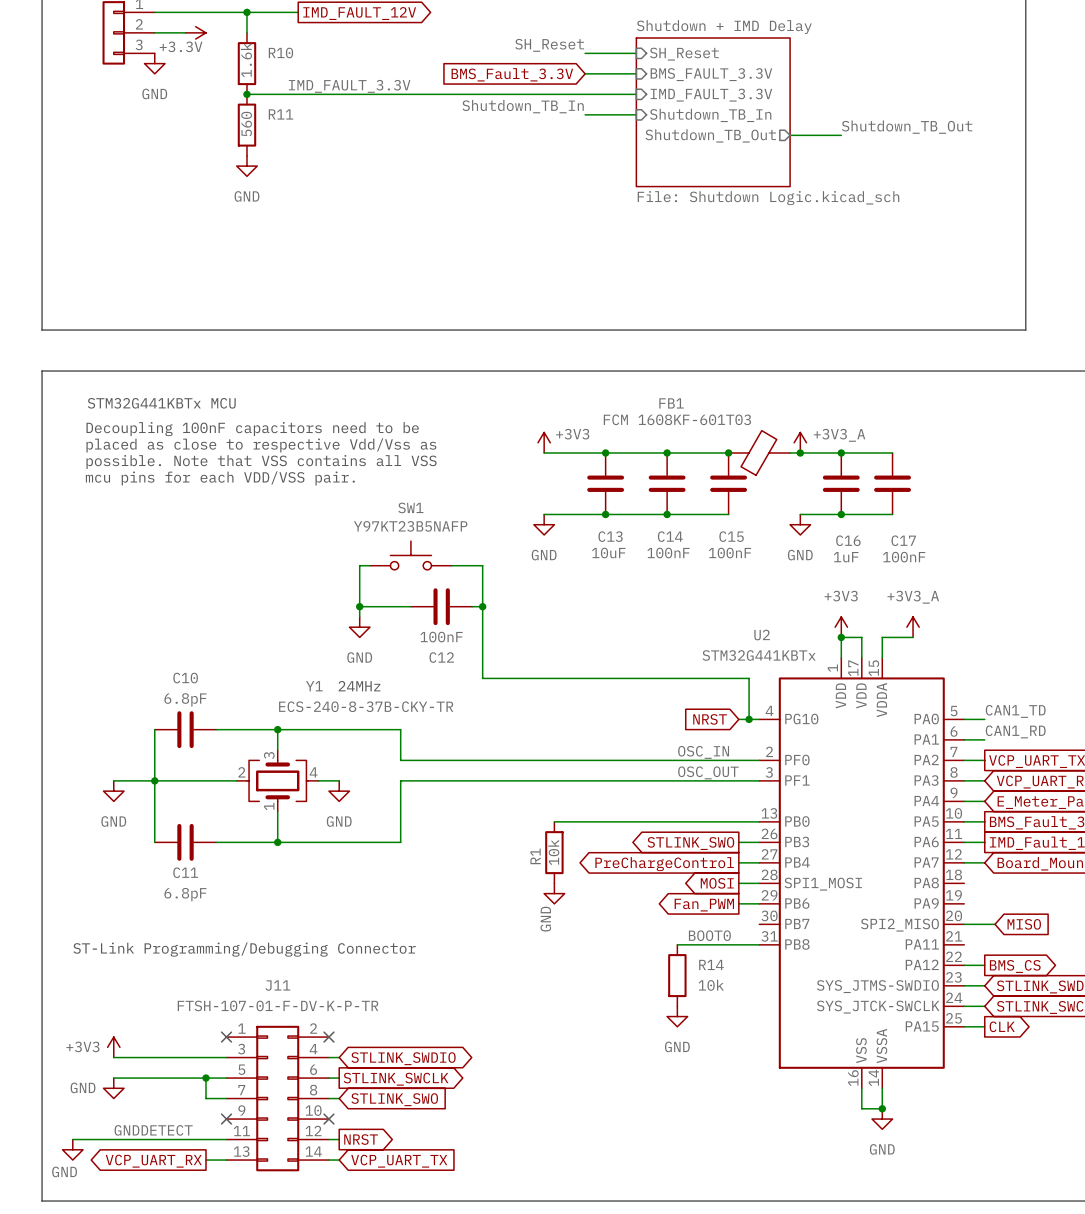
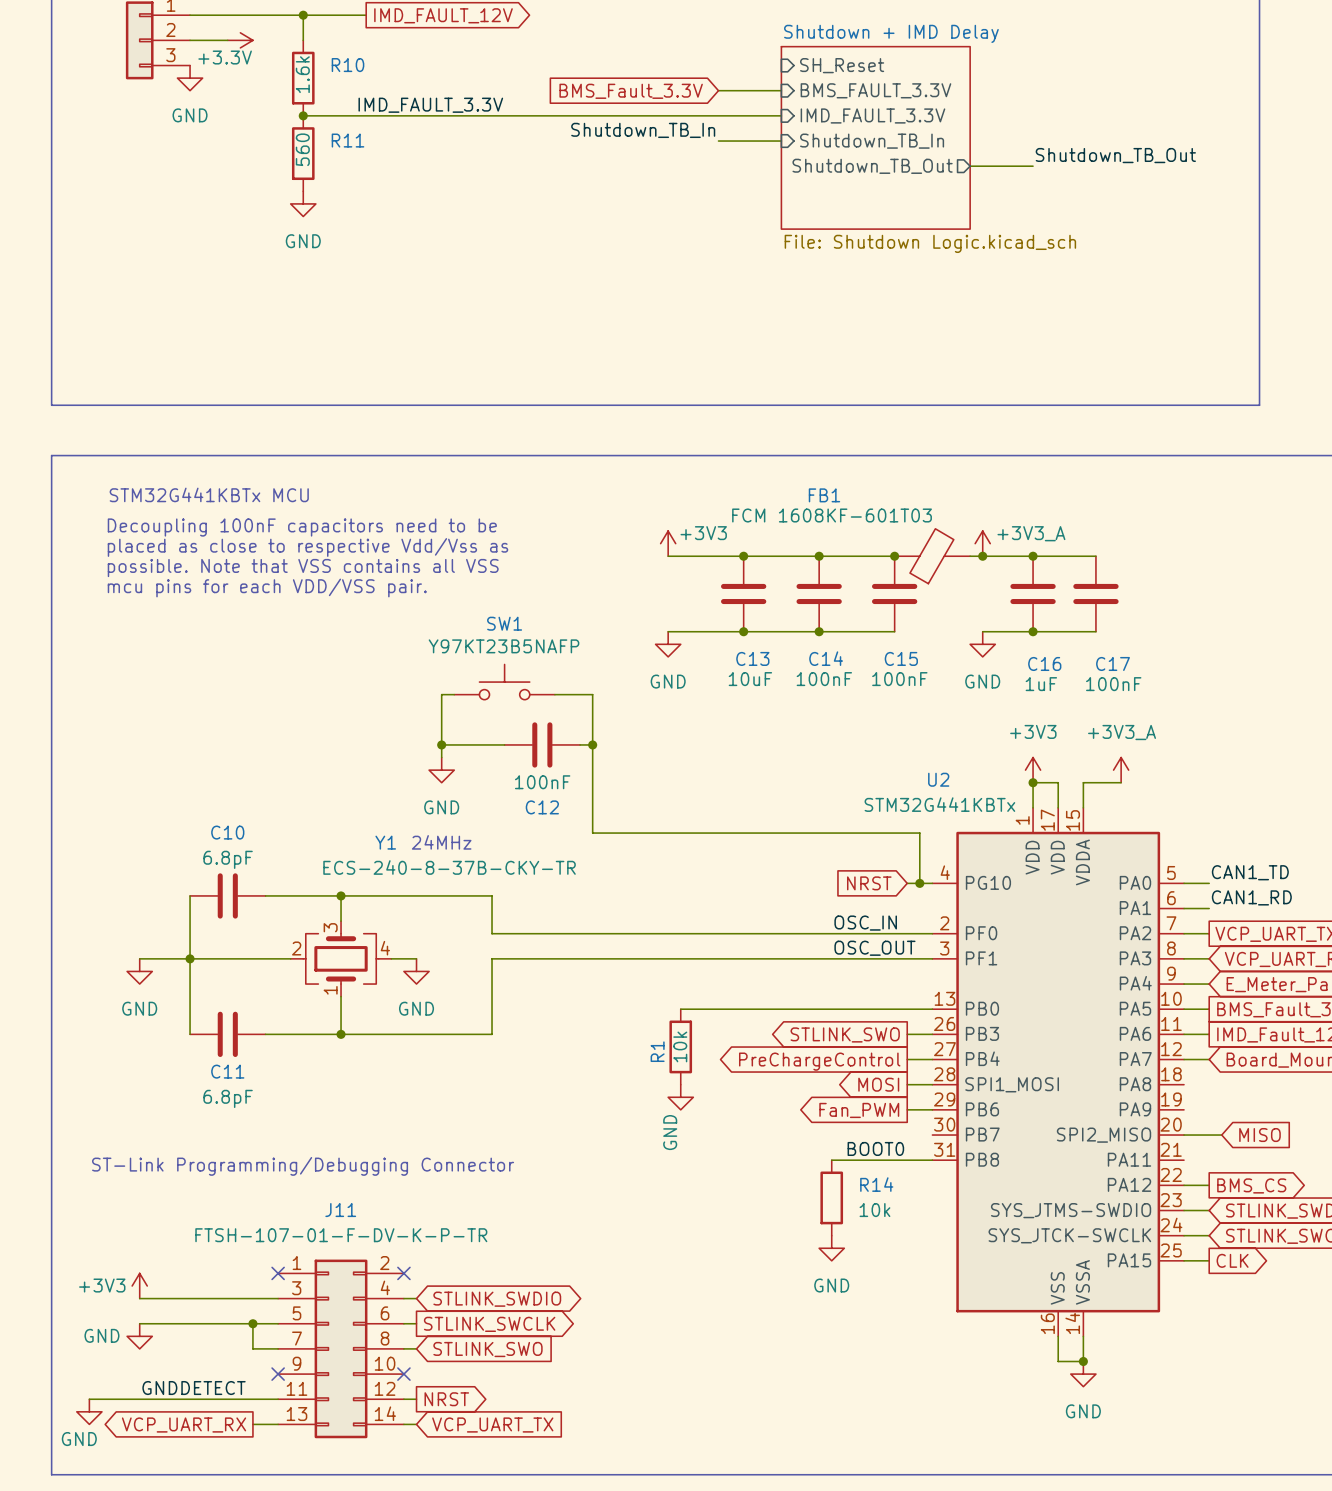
label: SH_Reset (549, 45) -> none
wire: (585, 53) (636, 53) -> none

